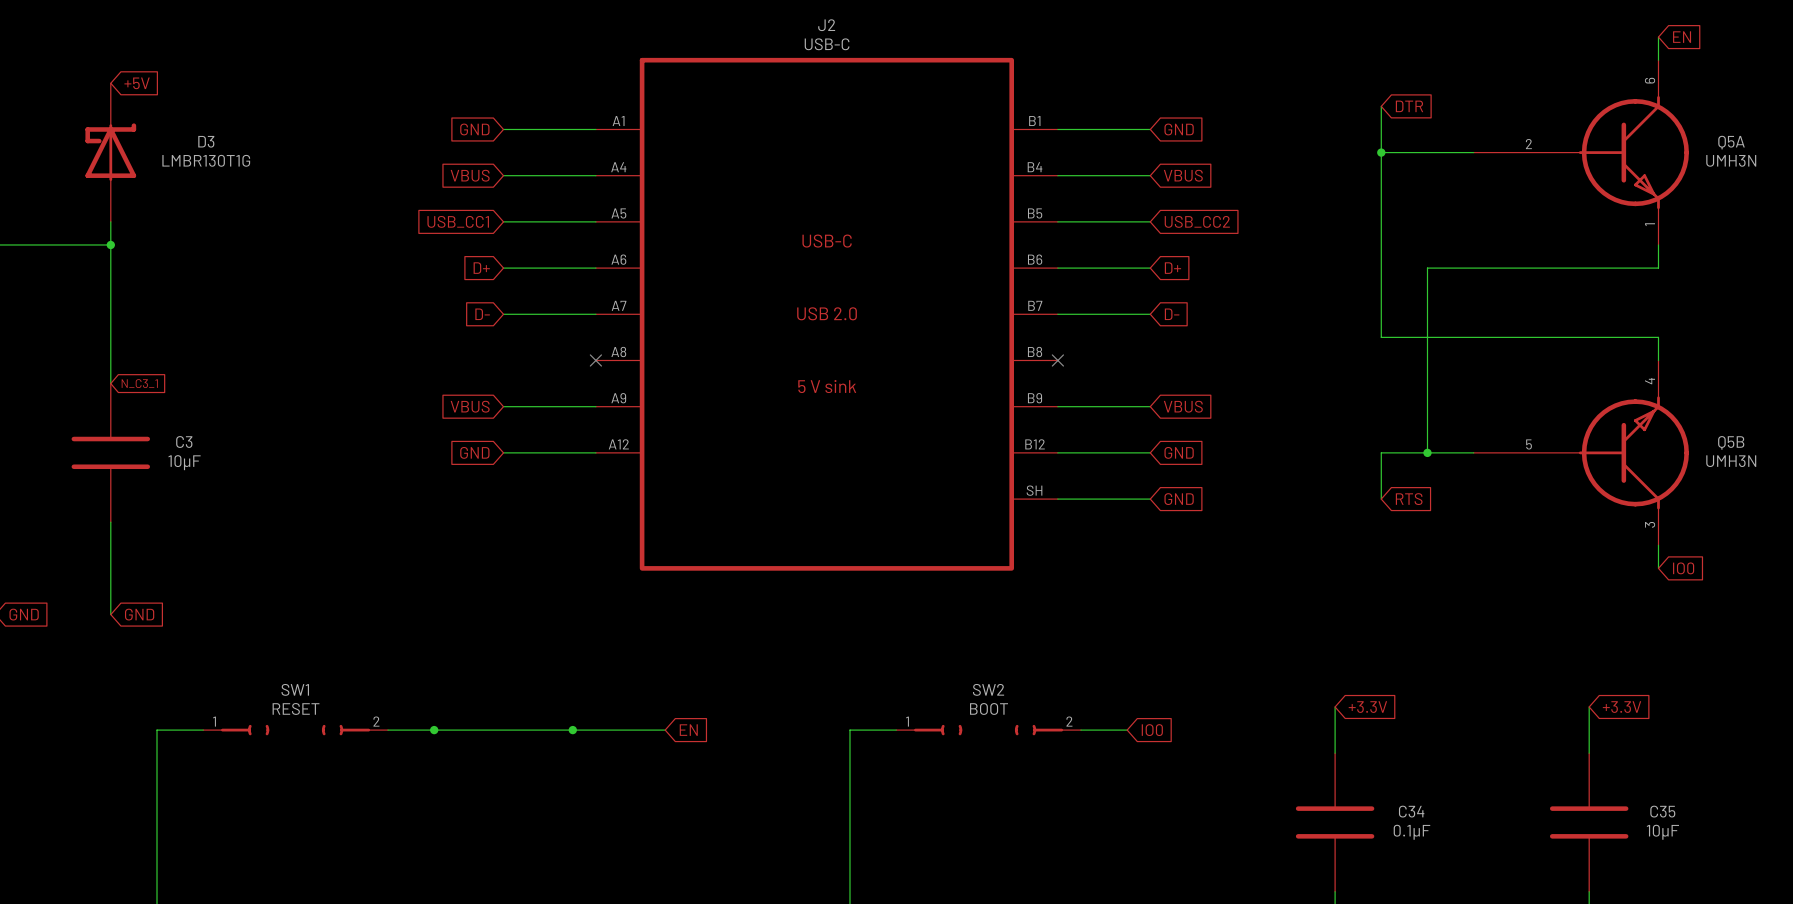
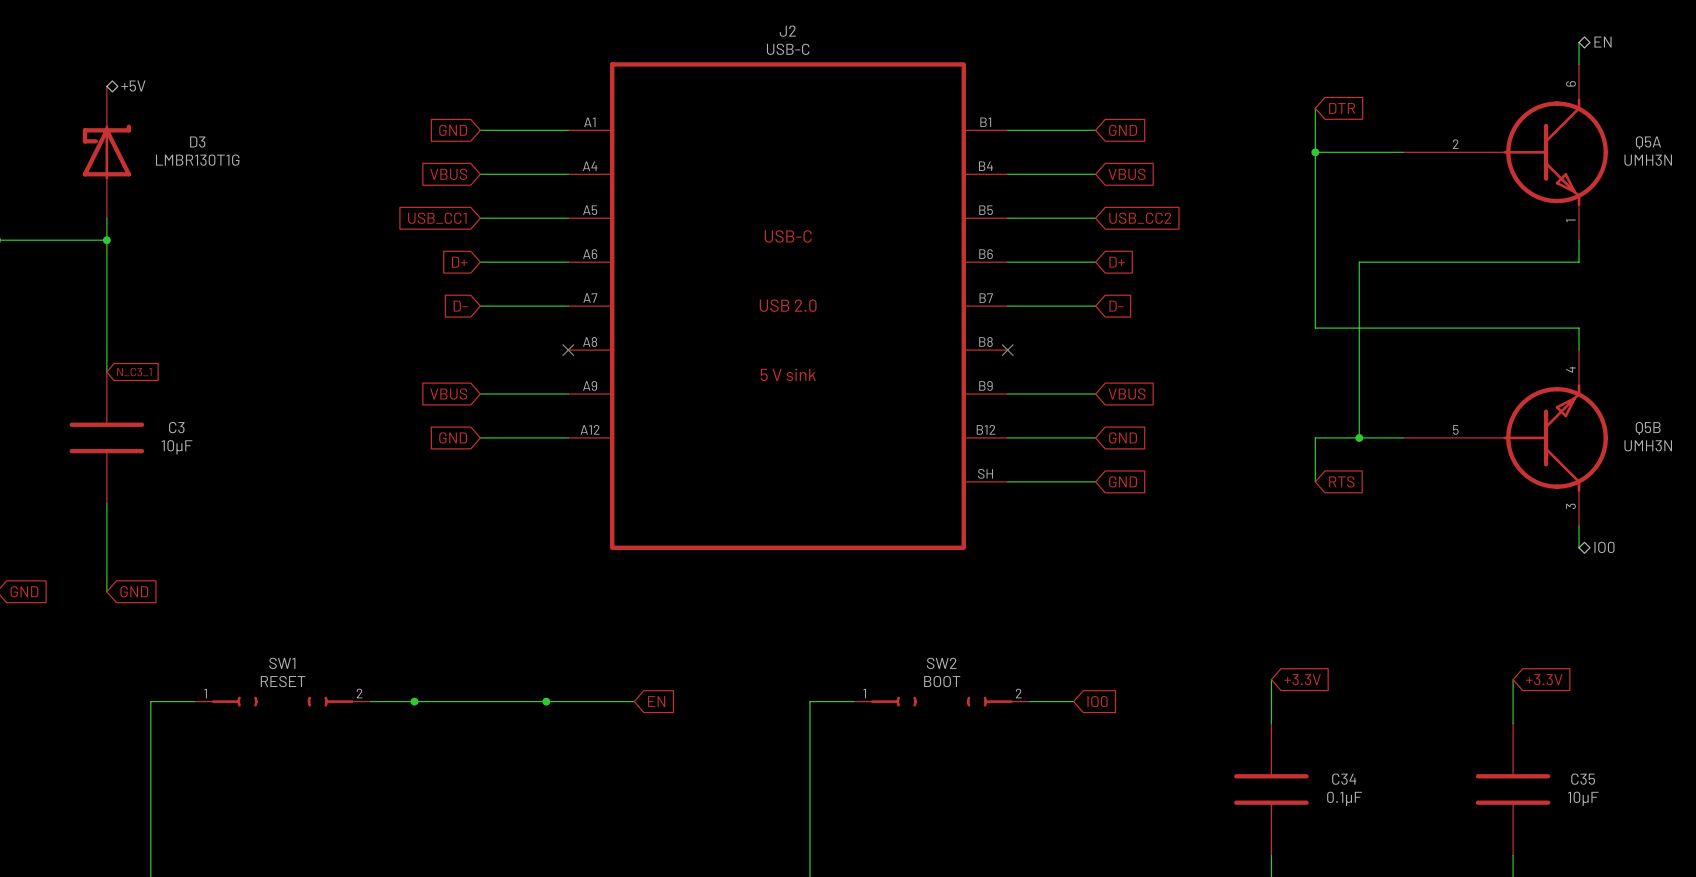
hierarchical label: none -> EN (1603, 42)
global label: EN (1682, 37) -> none
hierarchical label: none -> +5V (133, 86)
global label: +5V (137, 83) -> none
hierarchical label: none -> IO0 (1604, 547)
global label: IO0 (1683, 568) -> none

